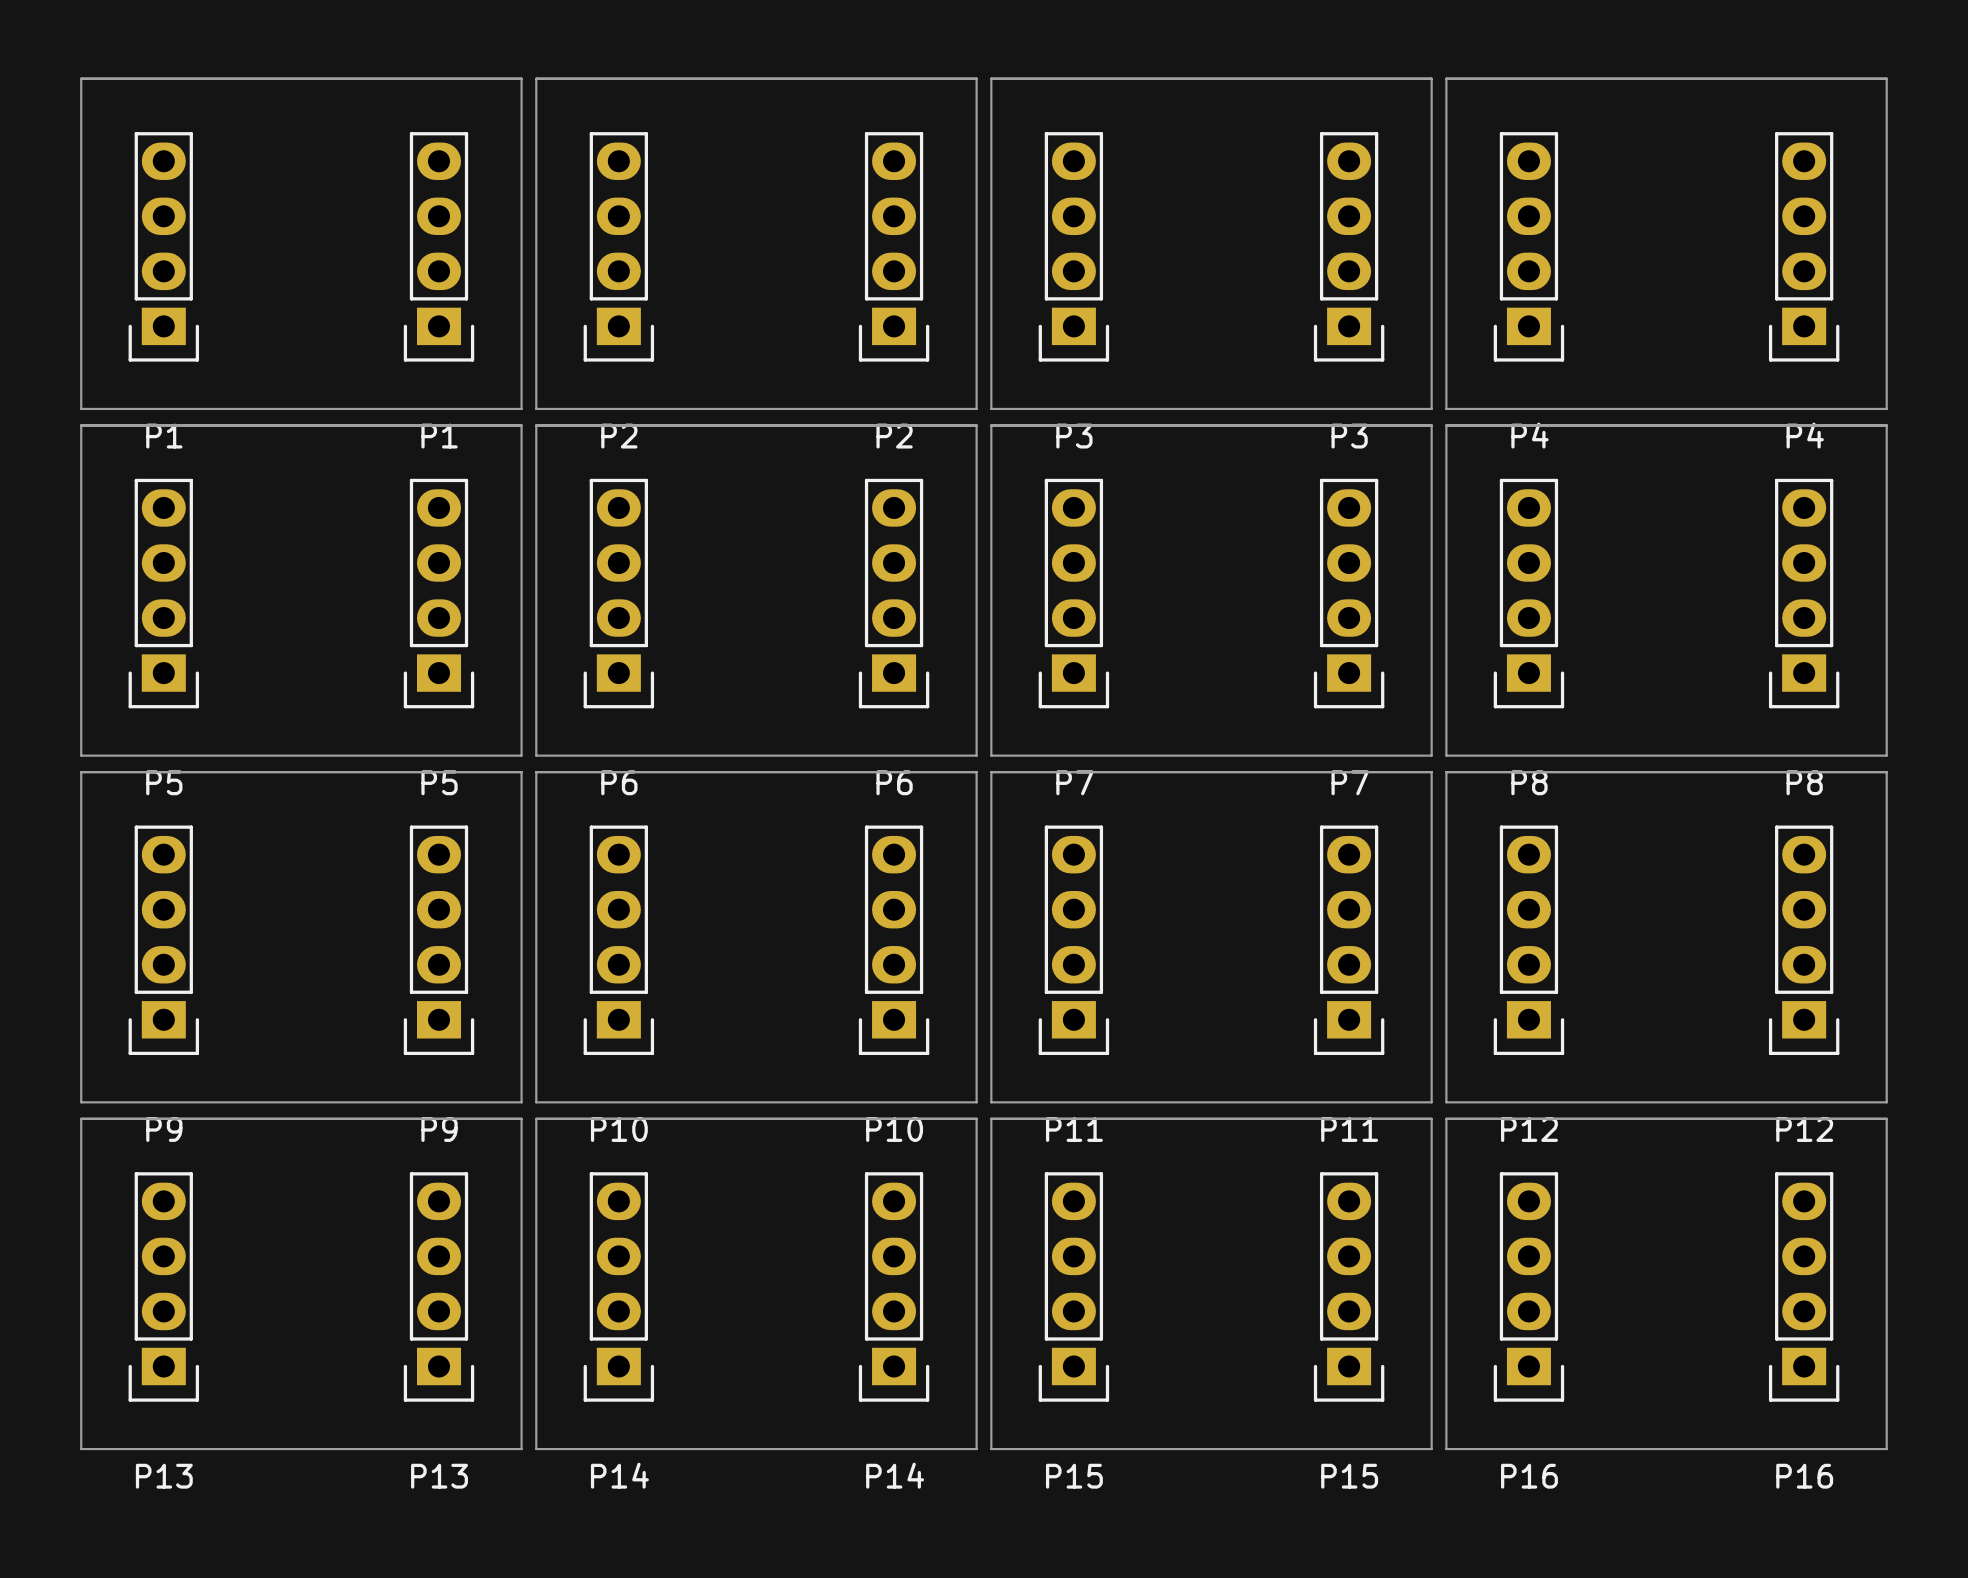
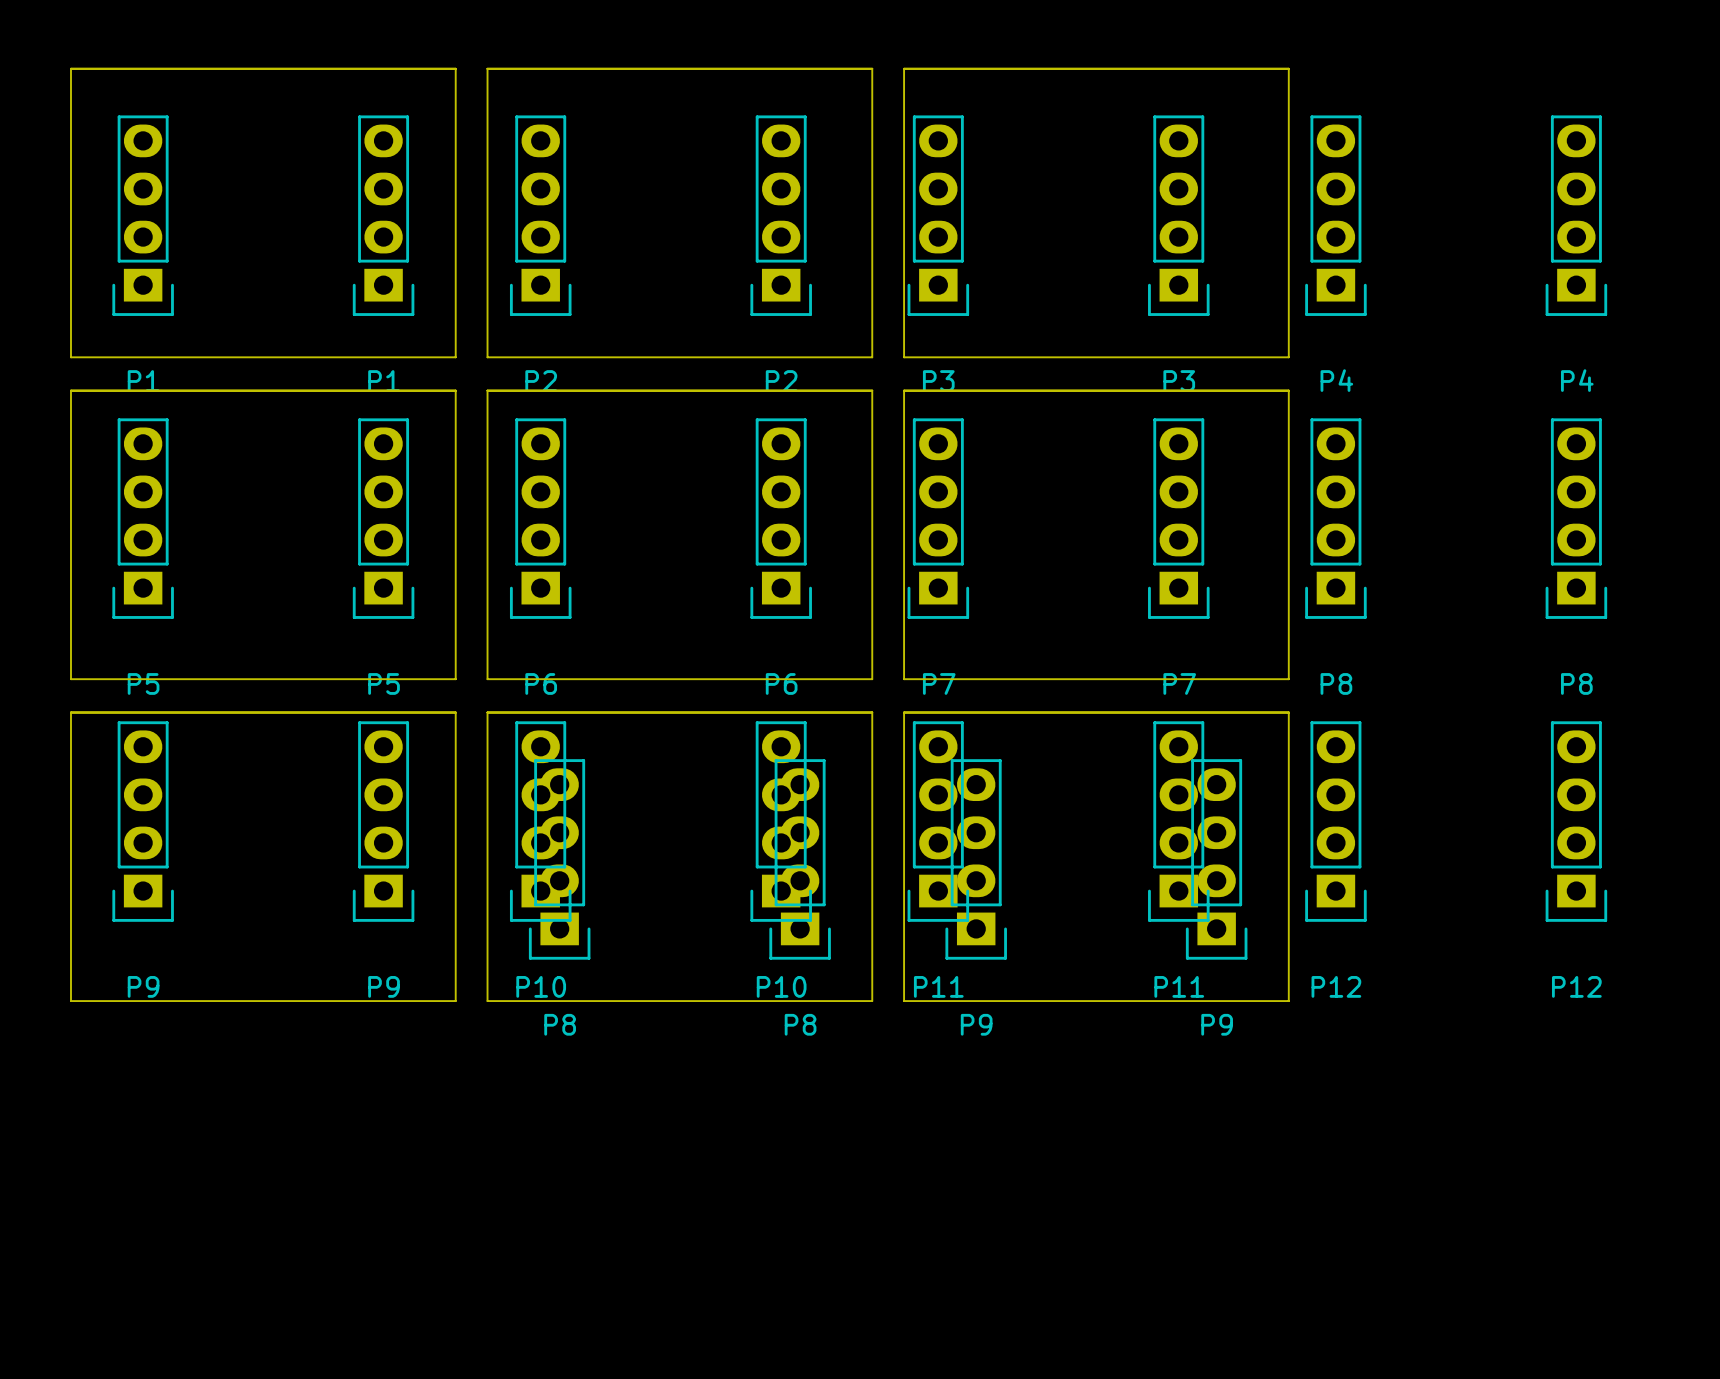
board edge: (557, 78) (536, 78) (536, 408) (557, 408) -> (487, 68) (487, 357)
board edge: (976, 78) (976, 408) -> (853, 68) (866, 68)
board edge: (991, 78) (991, 408) -> (853, 357) (866, 357)
board edge: (998, 78) (1034, 78) -> (872, 68) (872, 357)
board edge: (1431, 78) (1431, 408) -> (1250, 68) (1263, 68)
board edge: (1446, 78) (1446, 408) -> (1250, 357) (1263, 357)
board edge: (1475, 78) (1886, 78) (1886, 408) (1475, 408) -> (1288, 68) (1288, 357)
board edge: (998, 408) (1034, 408) -> (904, 68) (904, 357)
board edge: (536, 425) (976, 425) (976, 755) (536, 755) (536, 425) -> (487, 390) (872, 390) (872, 679) (487, 679) (487, 390)
board edge: (991, 425) (1431, 425) (1431, 755) (991, 755) (991, 425) -> (904, 390) (1288, 390) (1288, 679) (904, 679) (904, 390)
board edge: (1446, 425) (1886, 425) (1886, 755) (1446, 755) (1446, 425) -> none
board edge: (81, 447) (81, 425) (521, 425) (521, 447) -> (70, 390) (455, 390)
board edge: (81, 755) (521, 755) -> (70, 660) (70, 674)
board edge: (81, 772) (521, 772) -> (455, 660) (455, 674)
board edge: (536, 772) (976, 772) (976, 1102) (536, 1102) (536, 772) -> (487, 712) (872, 712) (872, 1001) (487, 1001) (487, 712)
board edge: (991, 772) (1431, 772) (1431, 1102) (991, 1102) (991, 772) -> (904, 712) (1288, 712) (1288, 1001) (904, 1001) (904, 712)
board edge: (1446, 772) (1886, 772) (1886, 1102) (1446, 1102) (1446, 772) -> none
board edge: (81, 777) (81, 815) -> (70, 679) (455, 679)
board edge: (521, 777) (521, 815) -> (70, 712) (455, 712)
P8: none -> (559, 859)
P8: none -> (800, 859)
P9: none -> (976, 859)
P9: none -> (1216, 859)
board edge: (81, 1102) (521, 1102) -> (70, 963) (70, 977)
board edge: (81, 1118) (521, 1118) -> (455, 963) (455, 977)
board edge: (536, 1118) (976, 1118) (976, 1449) (536, 1449) (536, 1118) -> none
board edge: (991, 1118) (1431, 1118) (1431, 1449) (991, 1449) (991, 1118) -> none
board edge: (1446, 1118) (1886, 1118) (1886, 1449) (1446, 1449) (1446, 1118) -> none
board edge: (81, 1145) (81, 1449) (521, 1449) (521, 1145) -> (70, 1001) (455, 1001)
P13: (163, 1286) -> none
P13: (439, 1286) -> none
P14: (618, 1286) -> none
P14: (894, 1286) -> none
P15: (1073, 1286) -> none
P15: (1349, 1286) -> none
P16: (1528, 1286) -> none
P16: (1804, 1286) -> none

